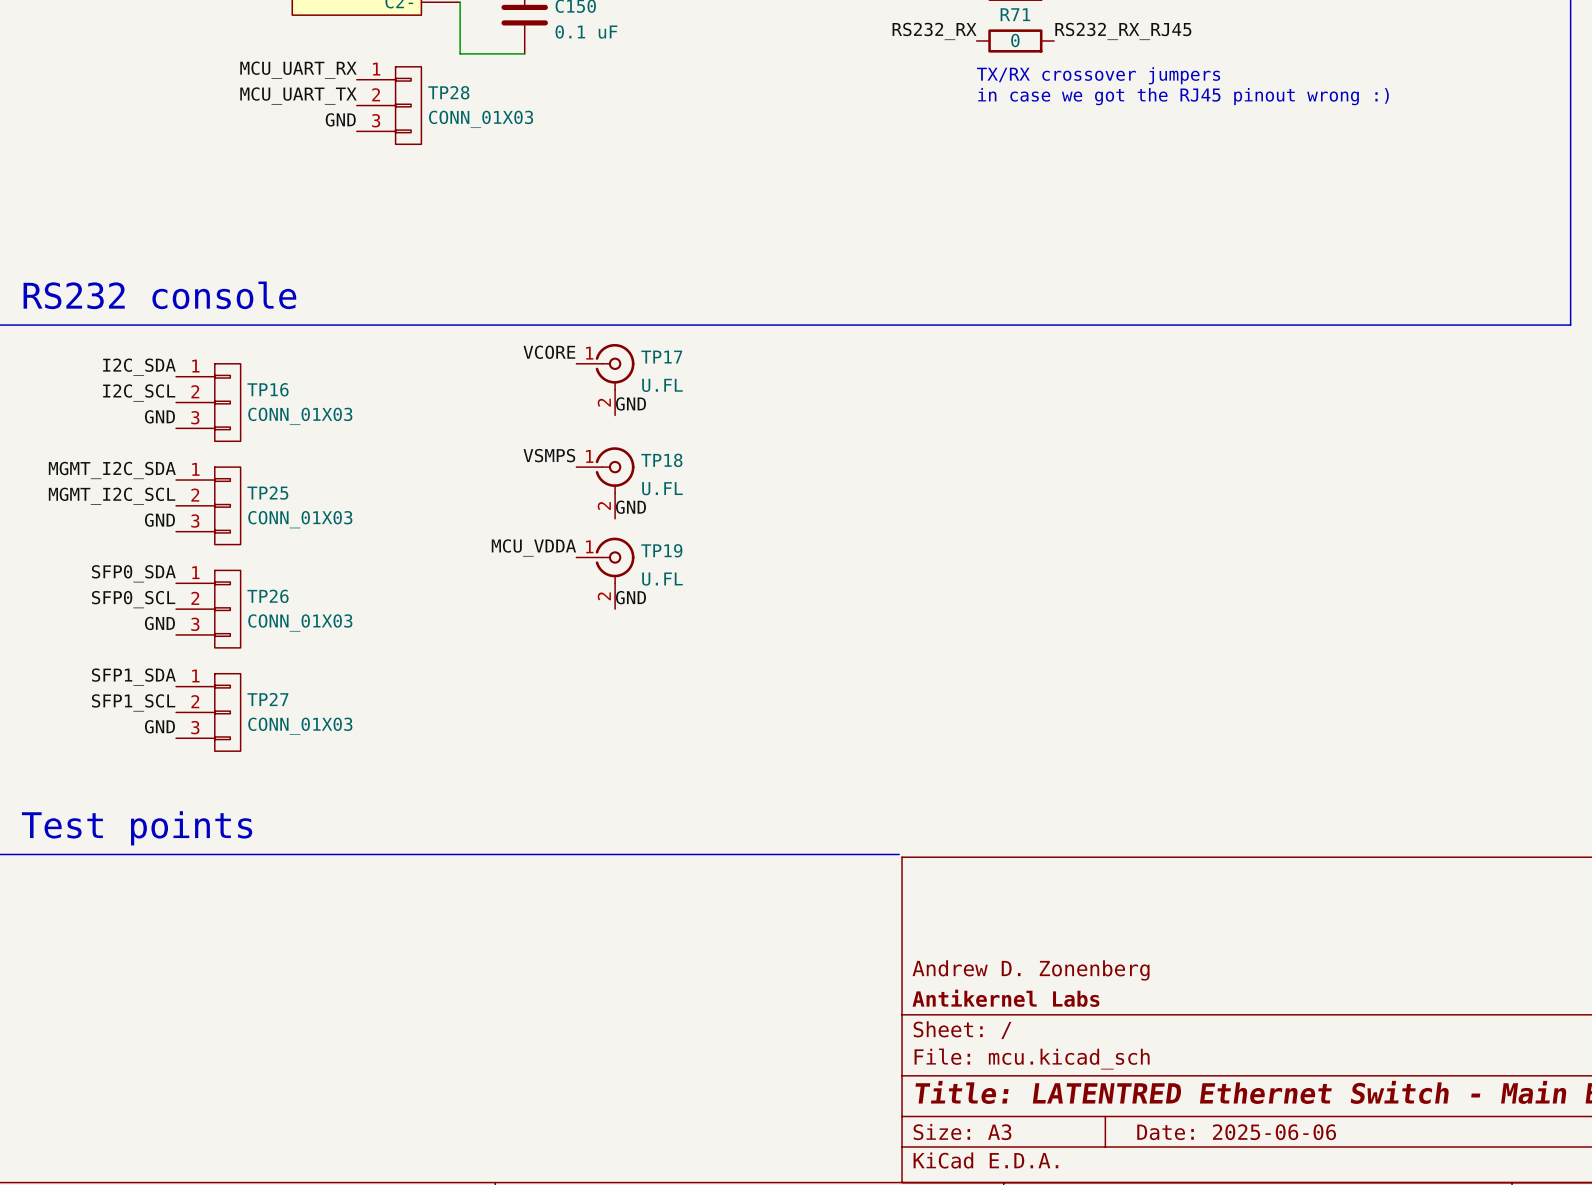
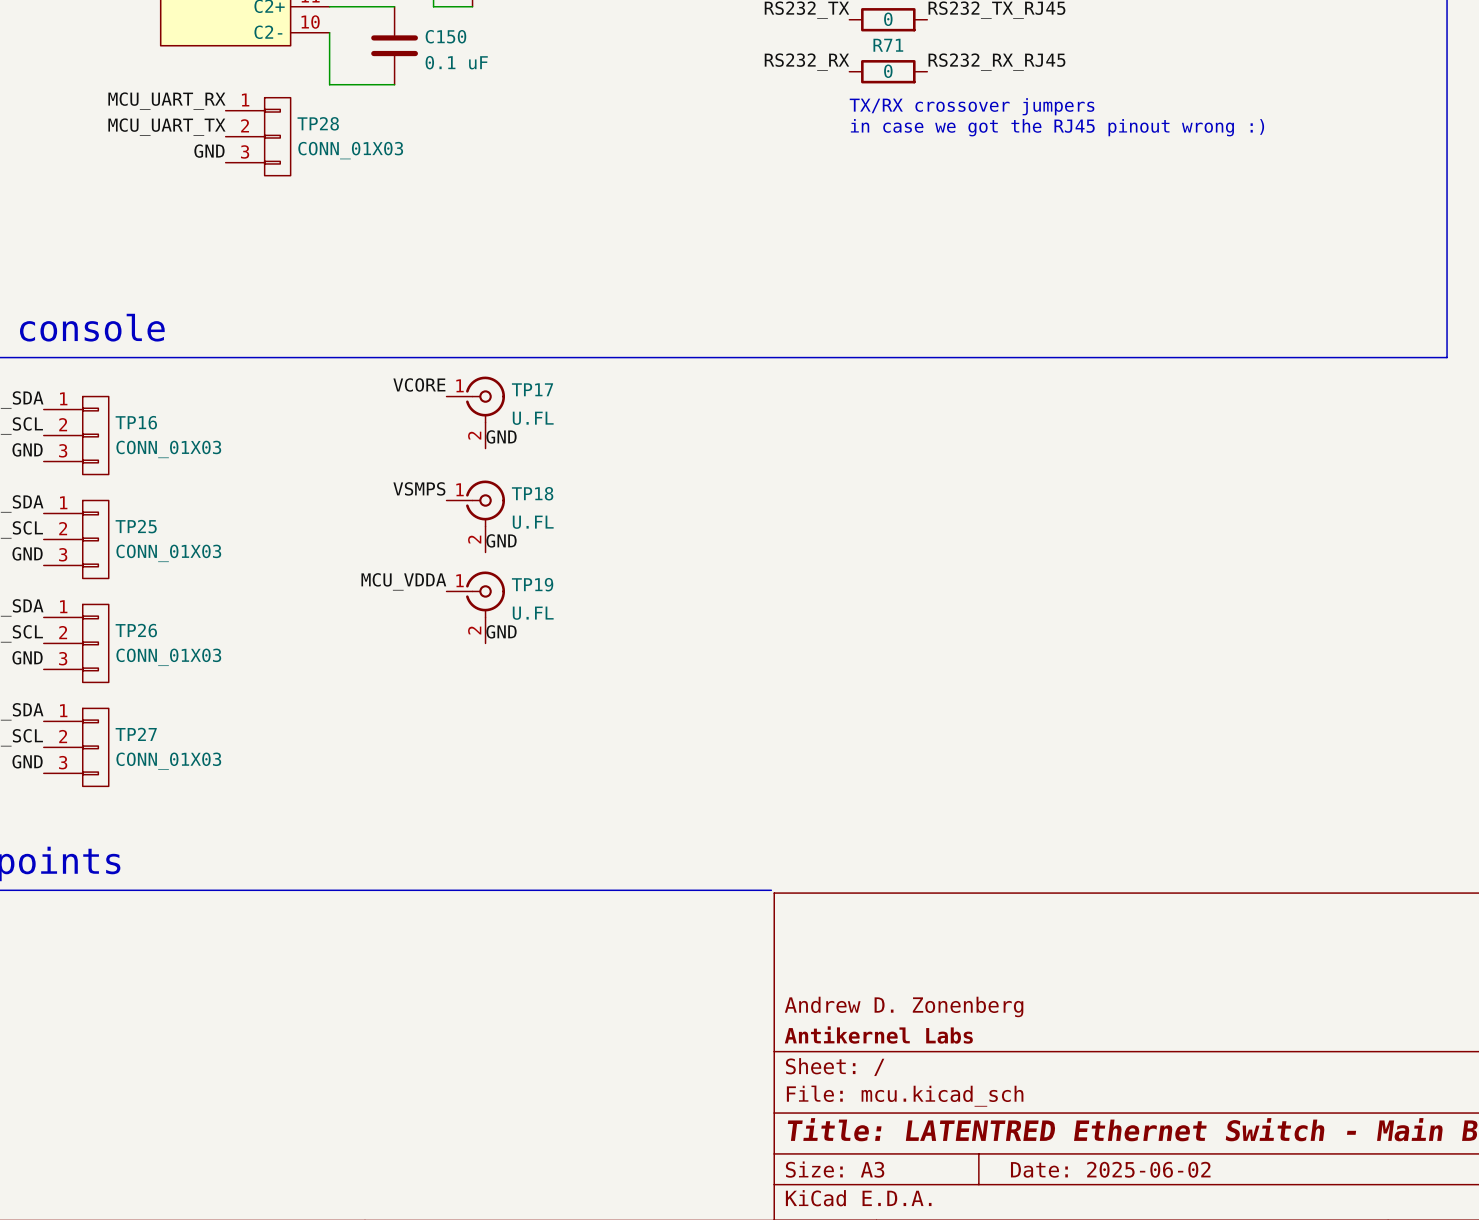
title block: Date: 2025-06-06 (1236, 1132) -> Date: 2025-06-02 (1110, 1169)

